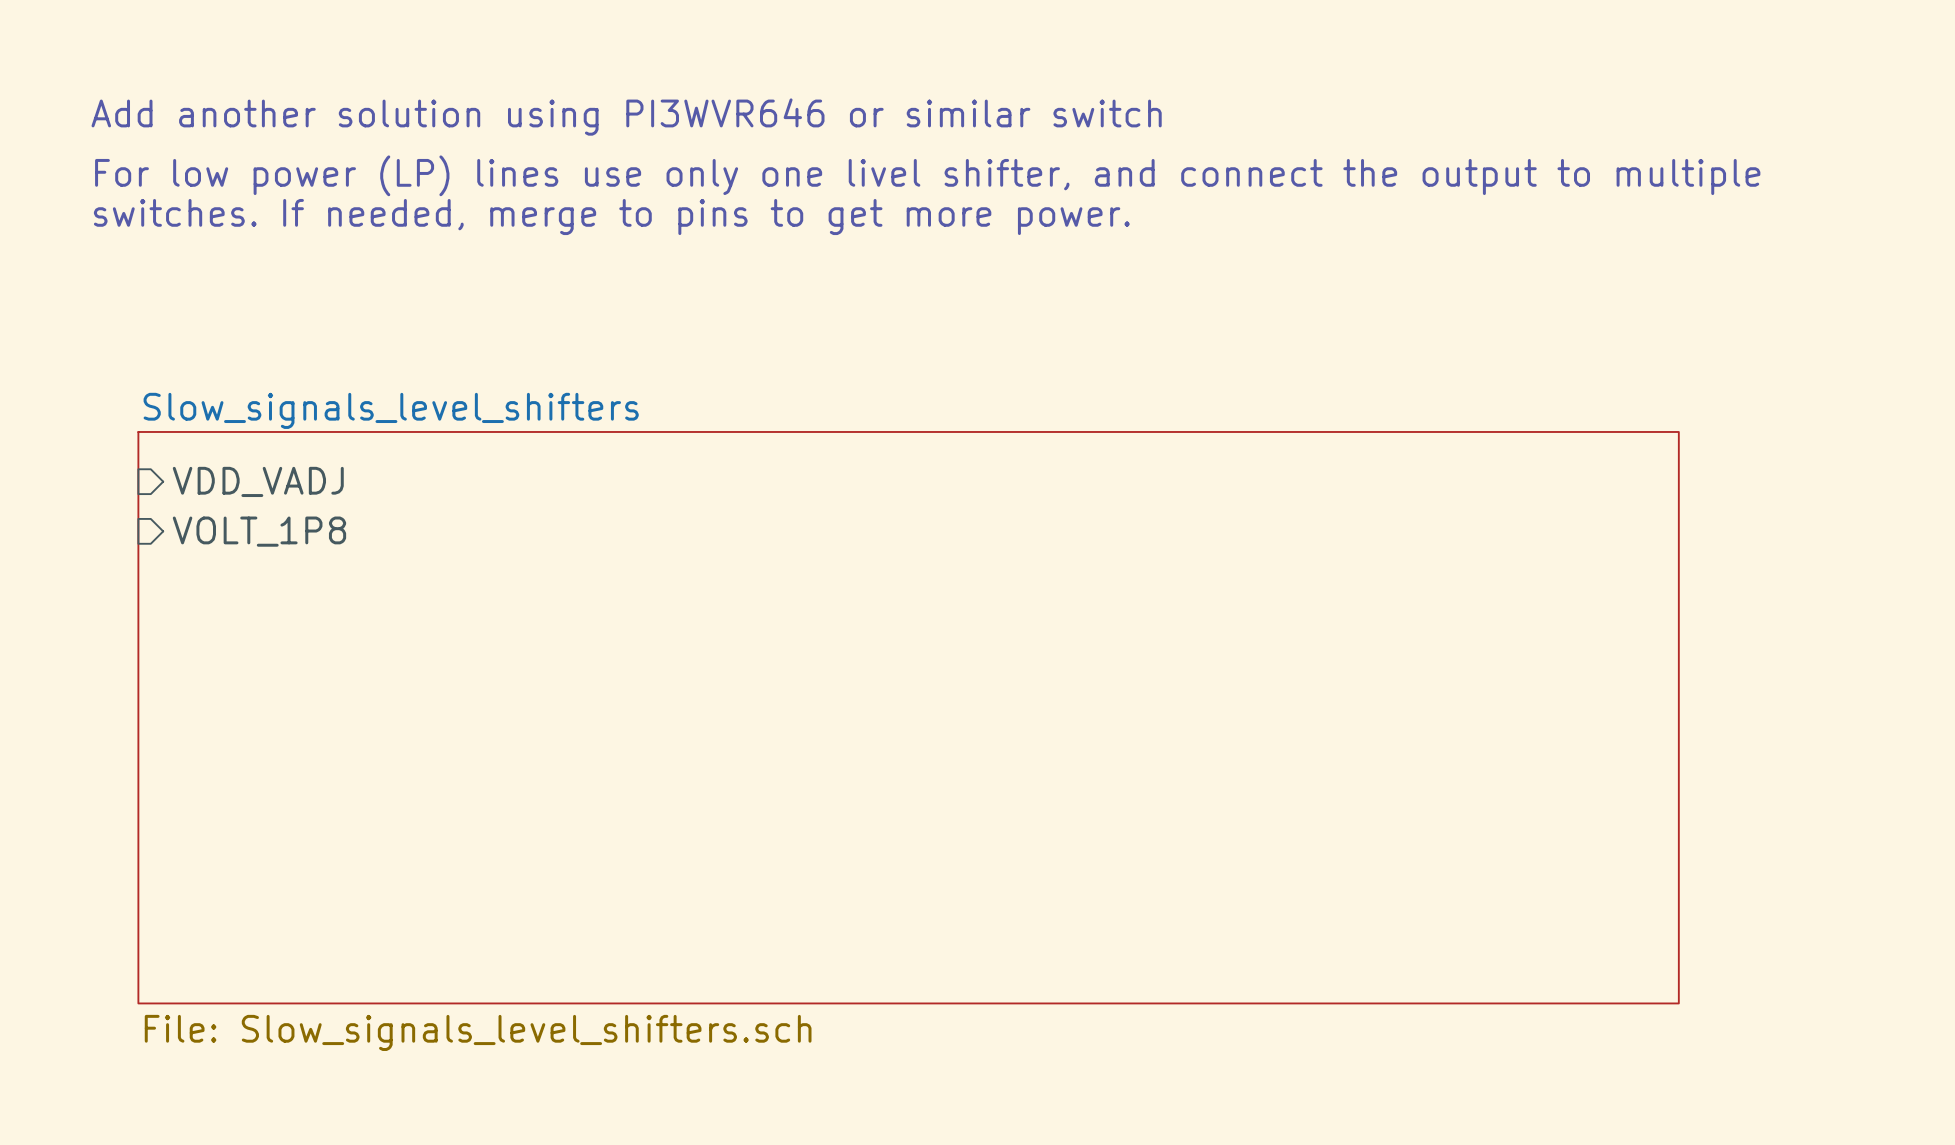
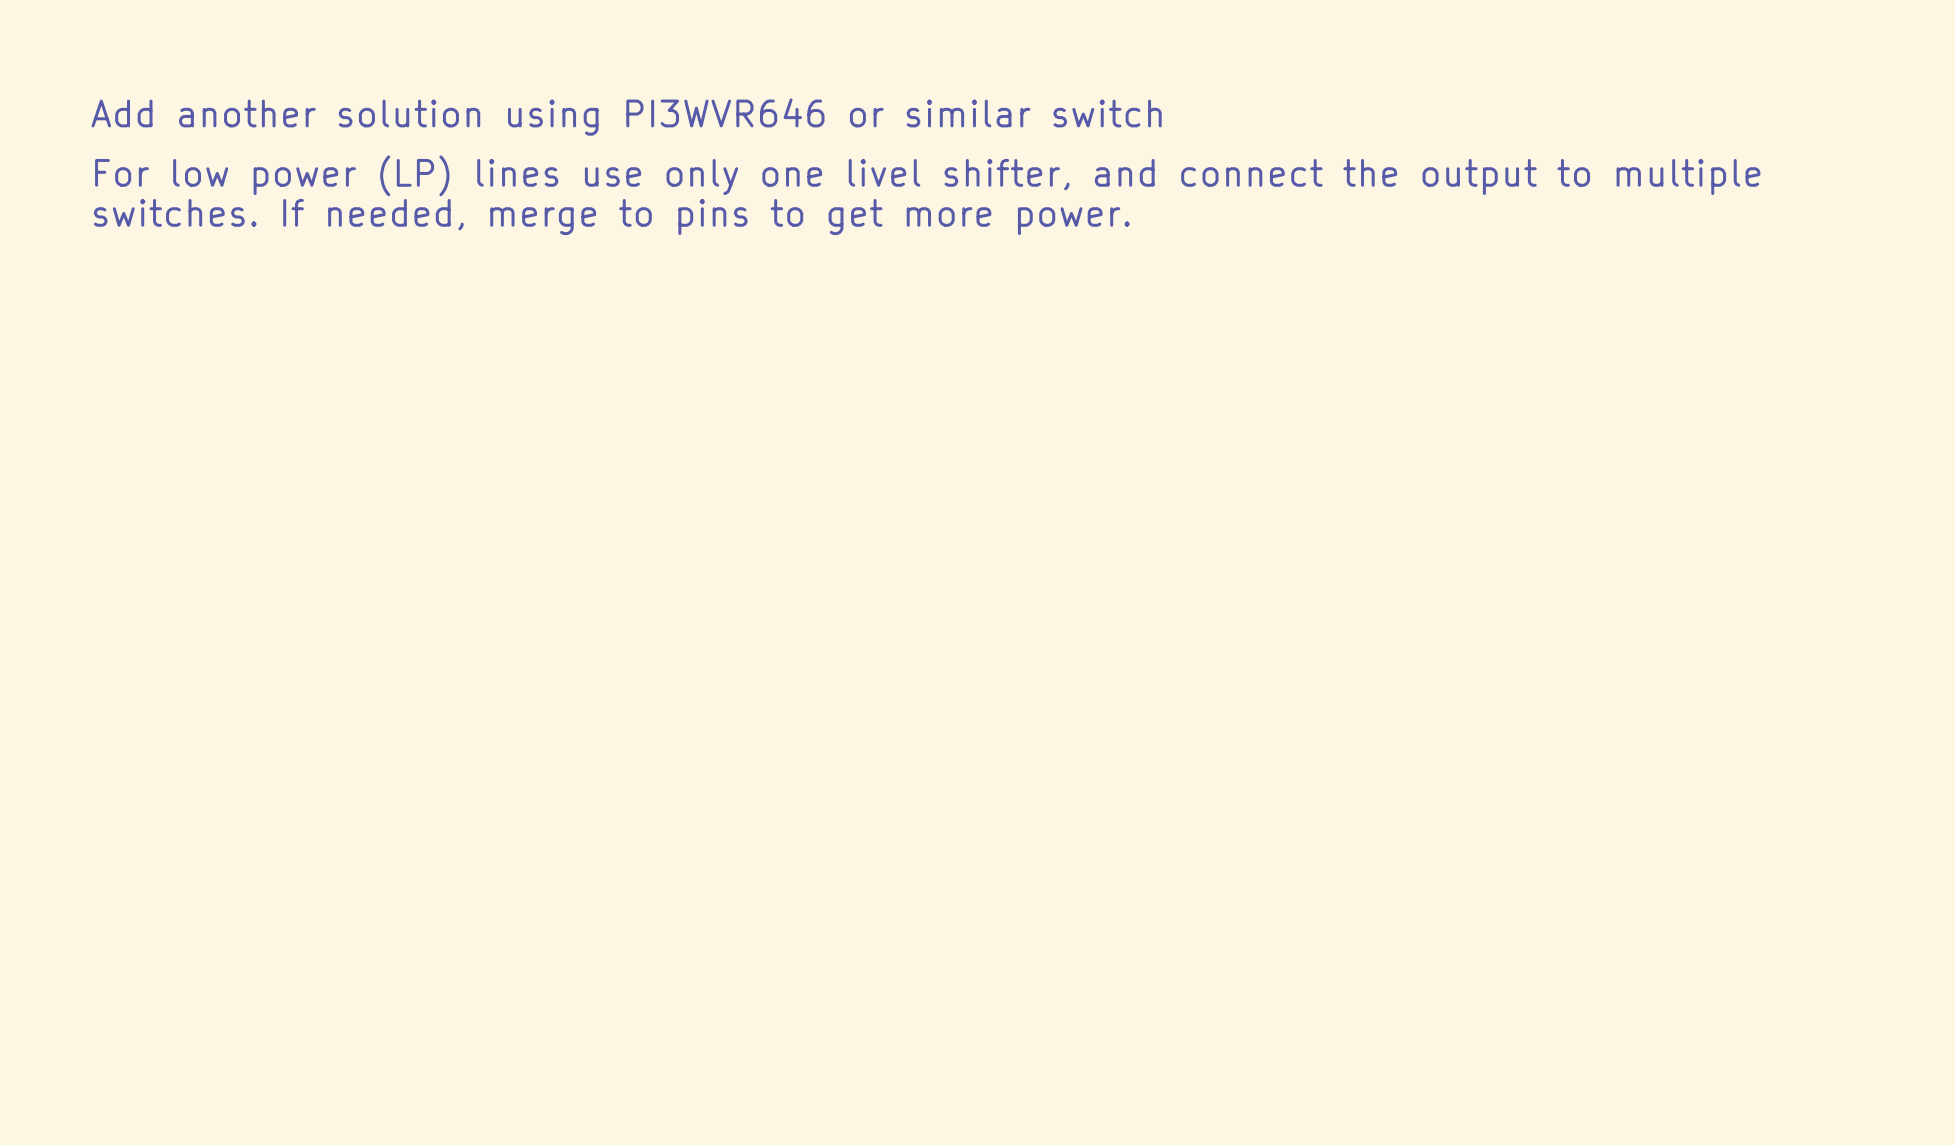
sheet pin: VDD_VADJ (258, 481) -> none
sheet pin: VOLT_1P8 (259, 531) -> none
sheet Slow_signals_level_shifters: File: Slow_signals_level_shifters.sch (908, 717) -> none

